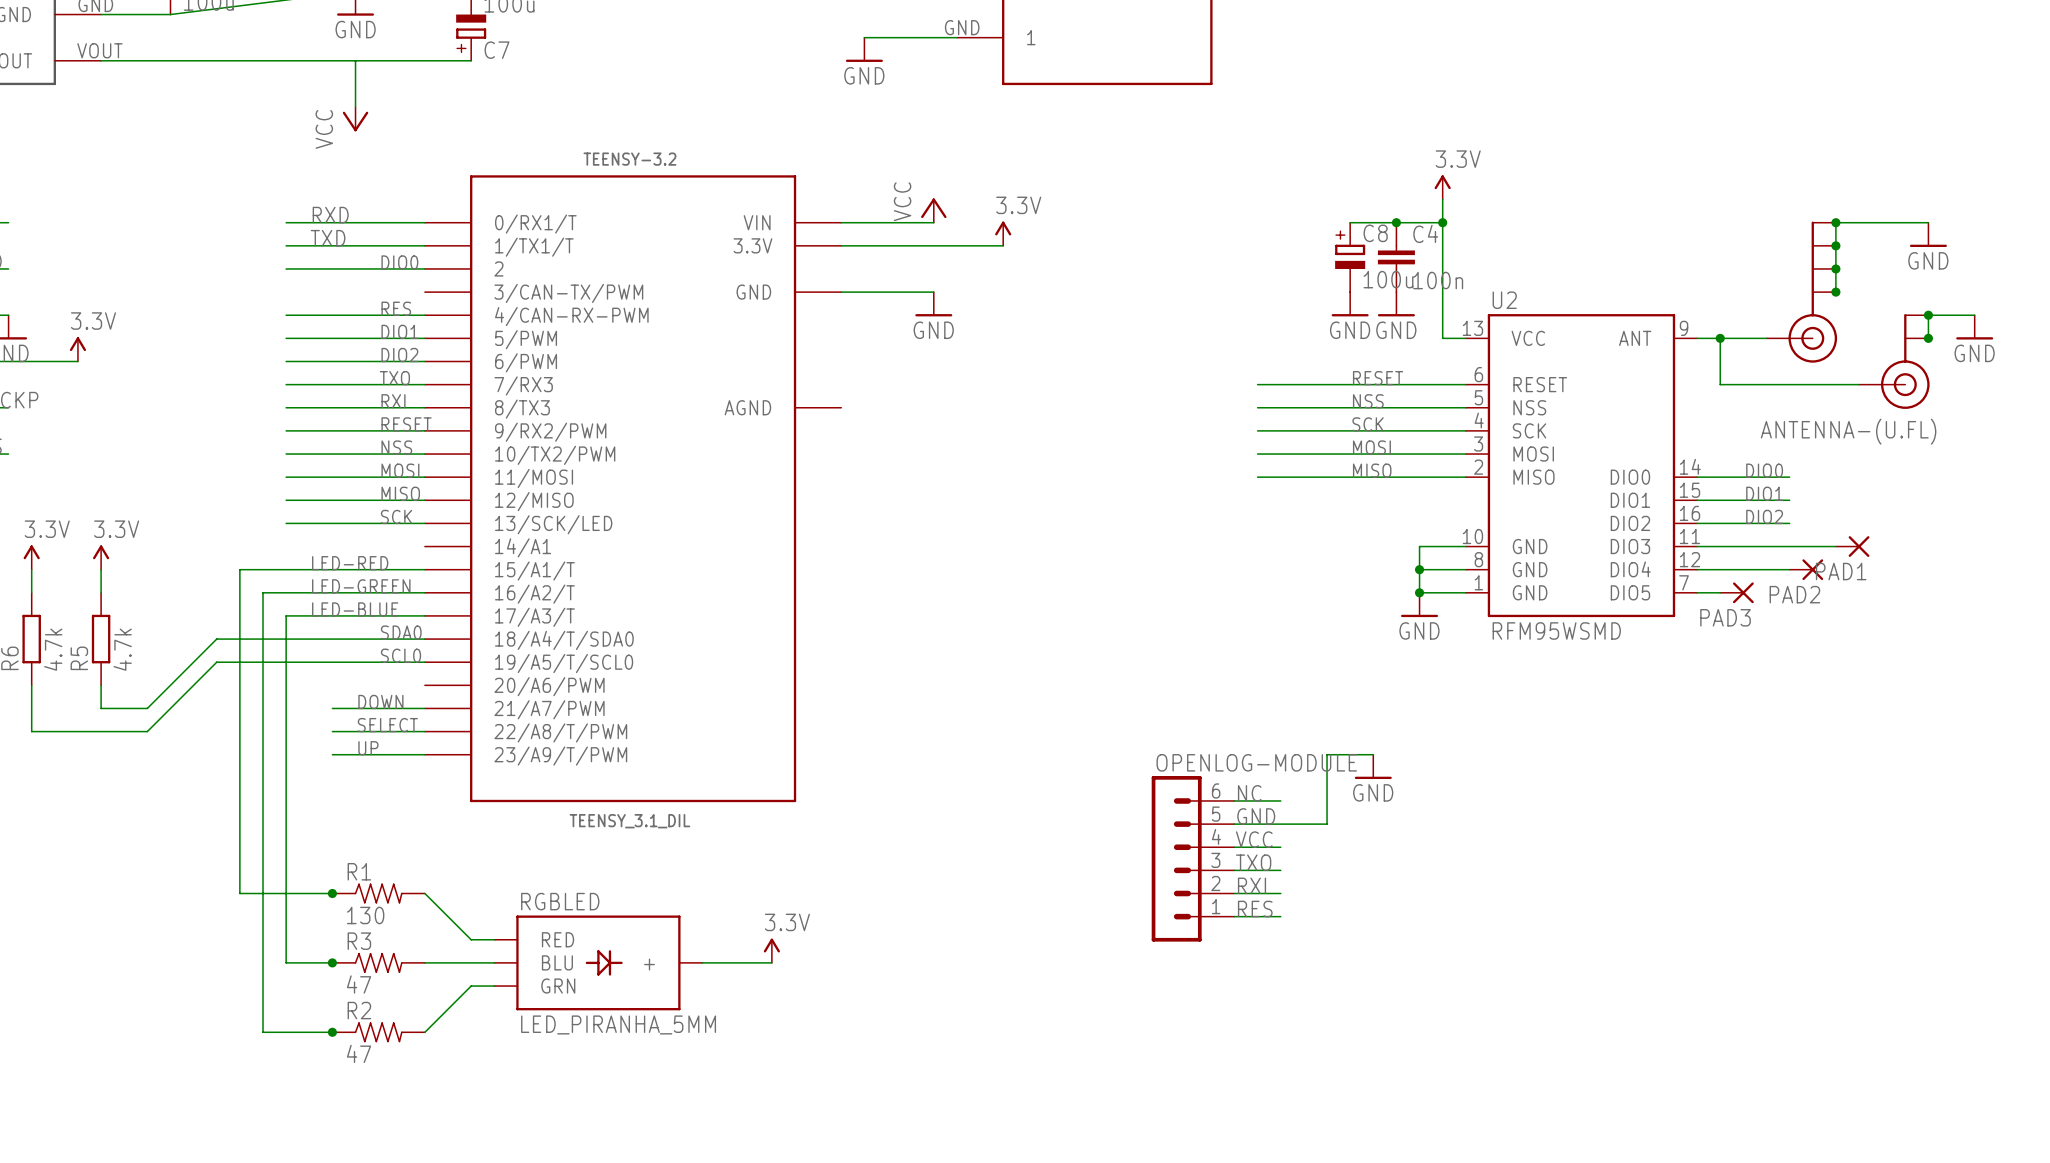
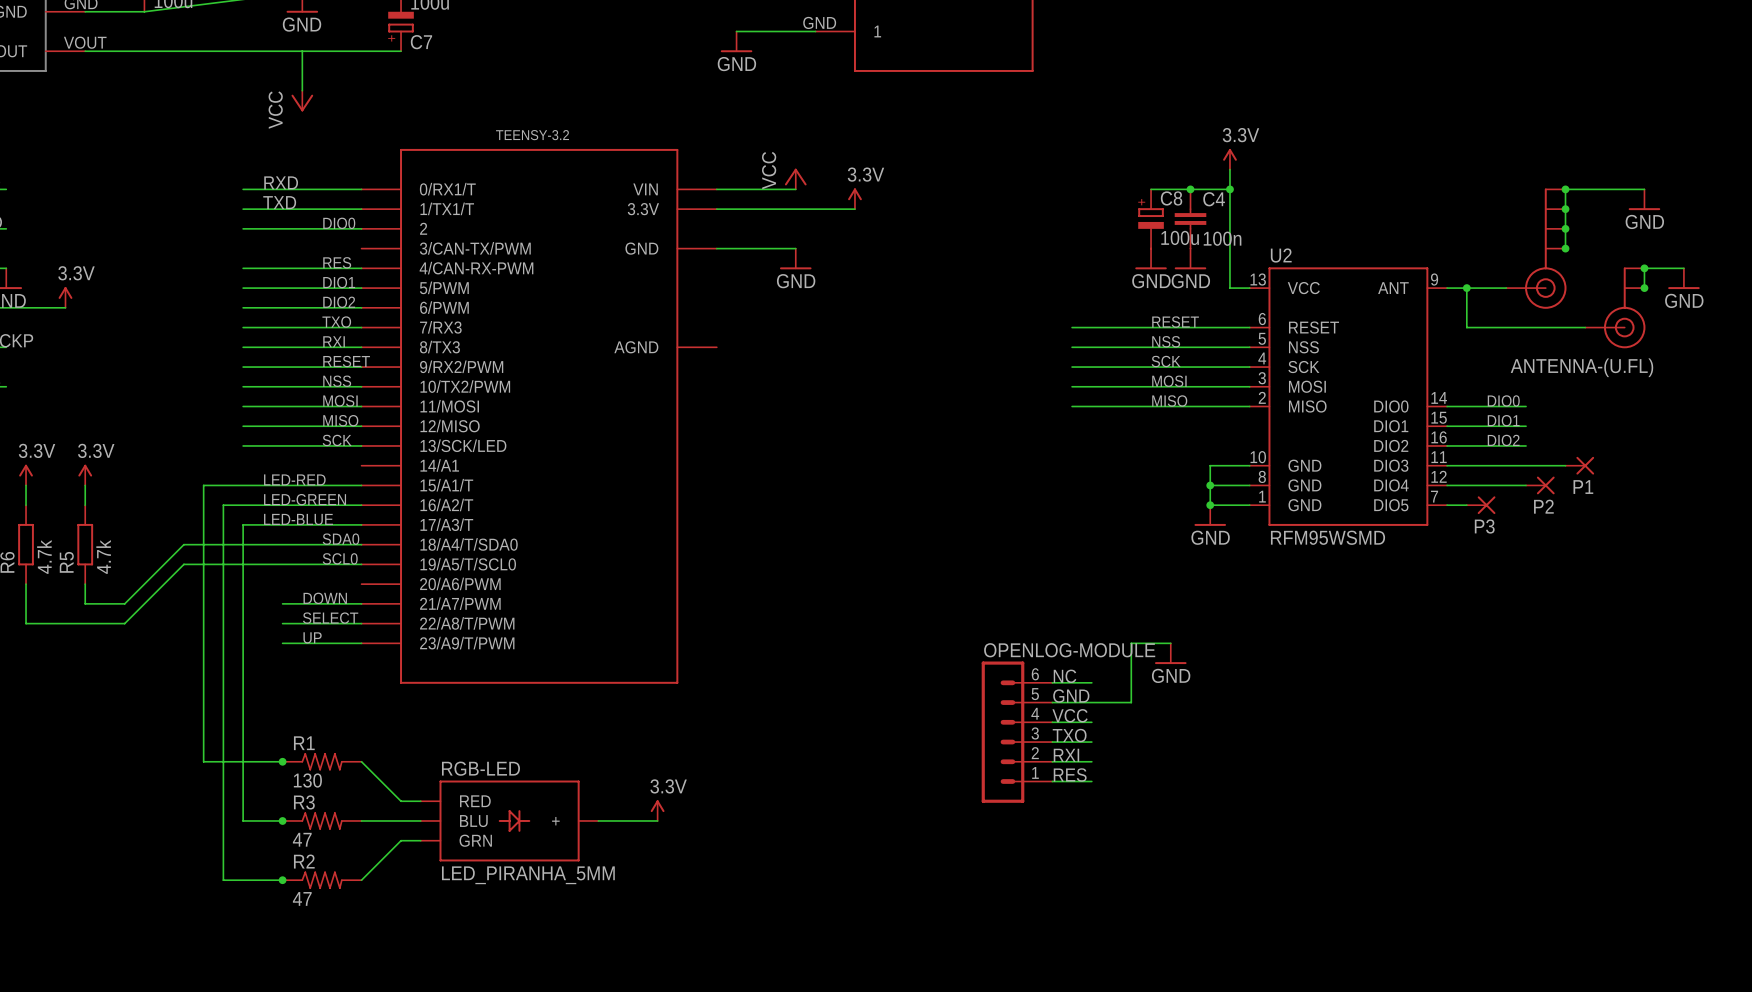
PAD1 name: PAD1 (1841, 571) -> P1 (1583, 487)
PAD2 name: PAD2 (1794, 594) -> P2 (1543, 506)
PAD3 name: PAD3 (1725, 617) -> P3 (1484, 526)
TEENSY-3.2 value: TEENSY_3.1_DIL (629, 821) -> none
RGBLED name: RGBLED (560, 901) -> RGB-LED (480, 768)

